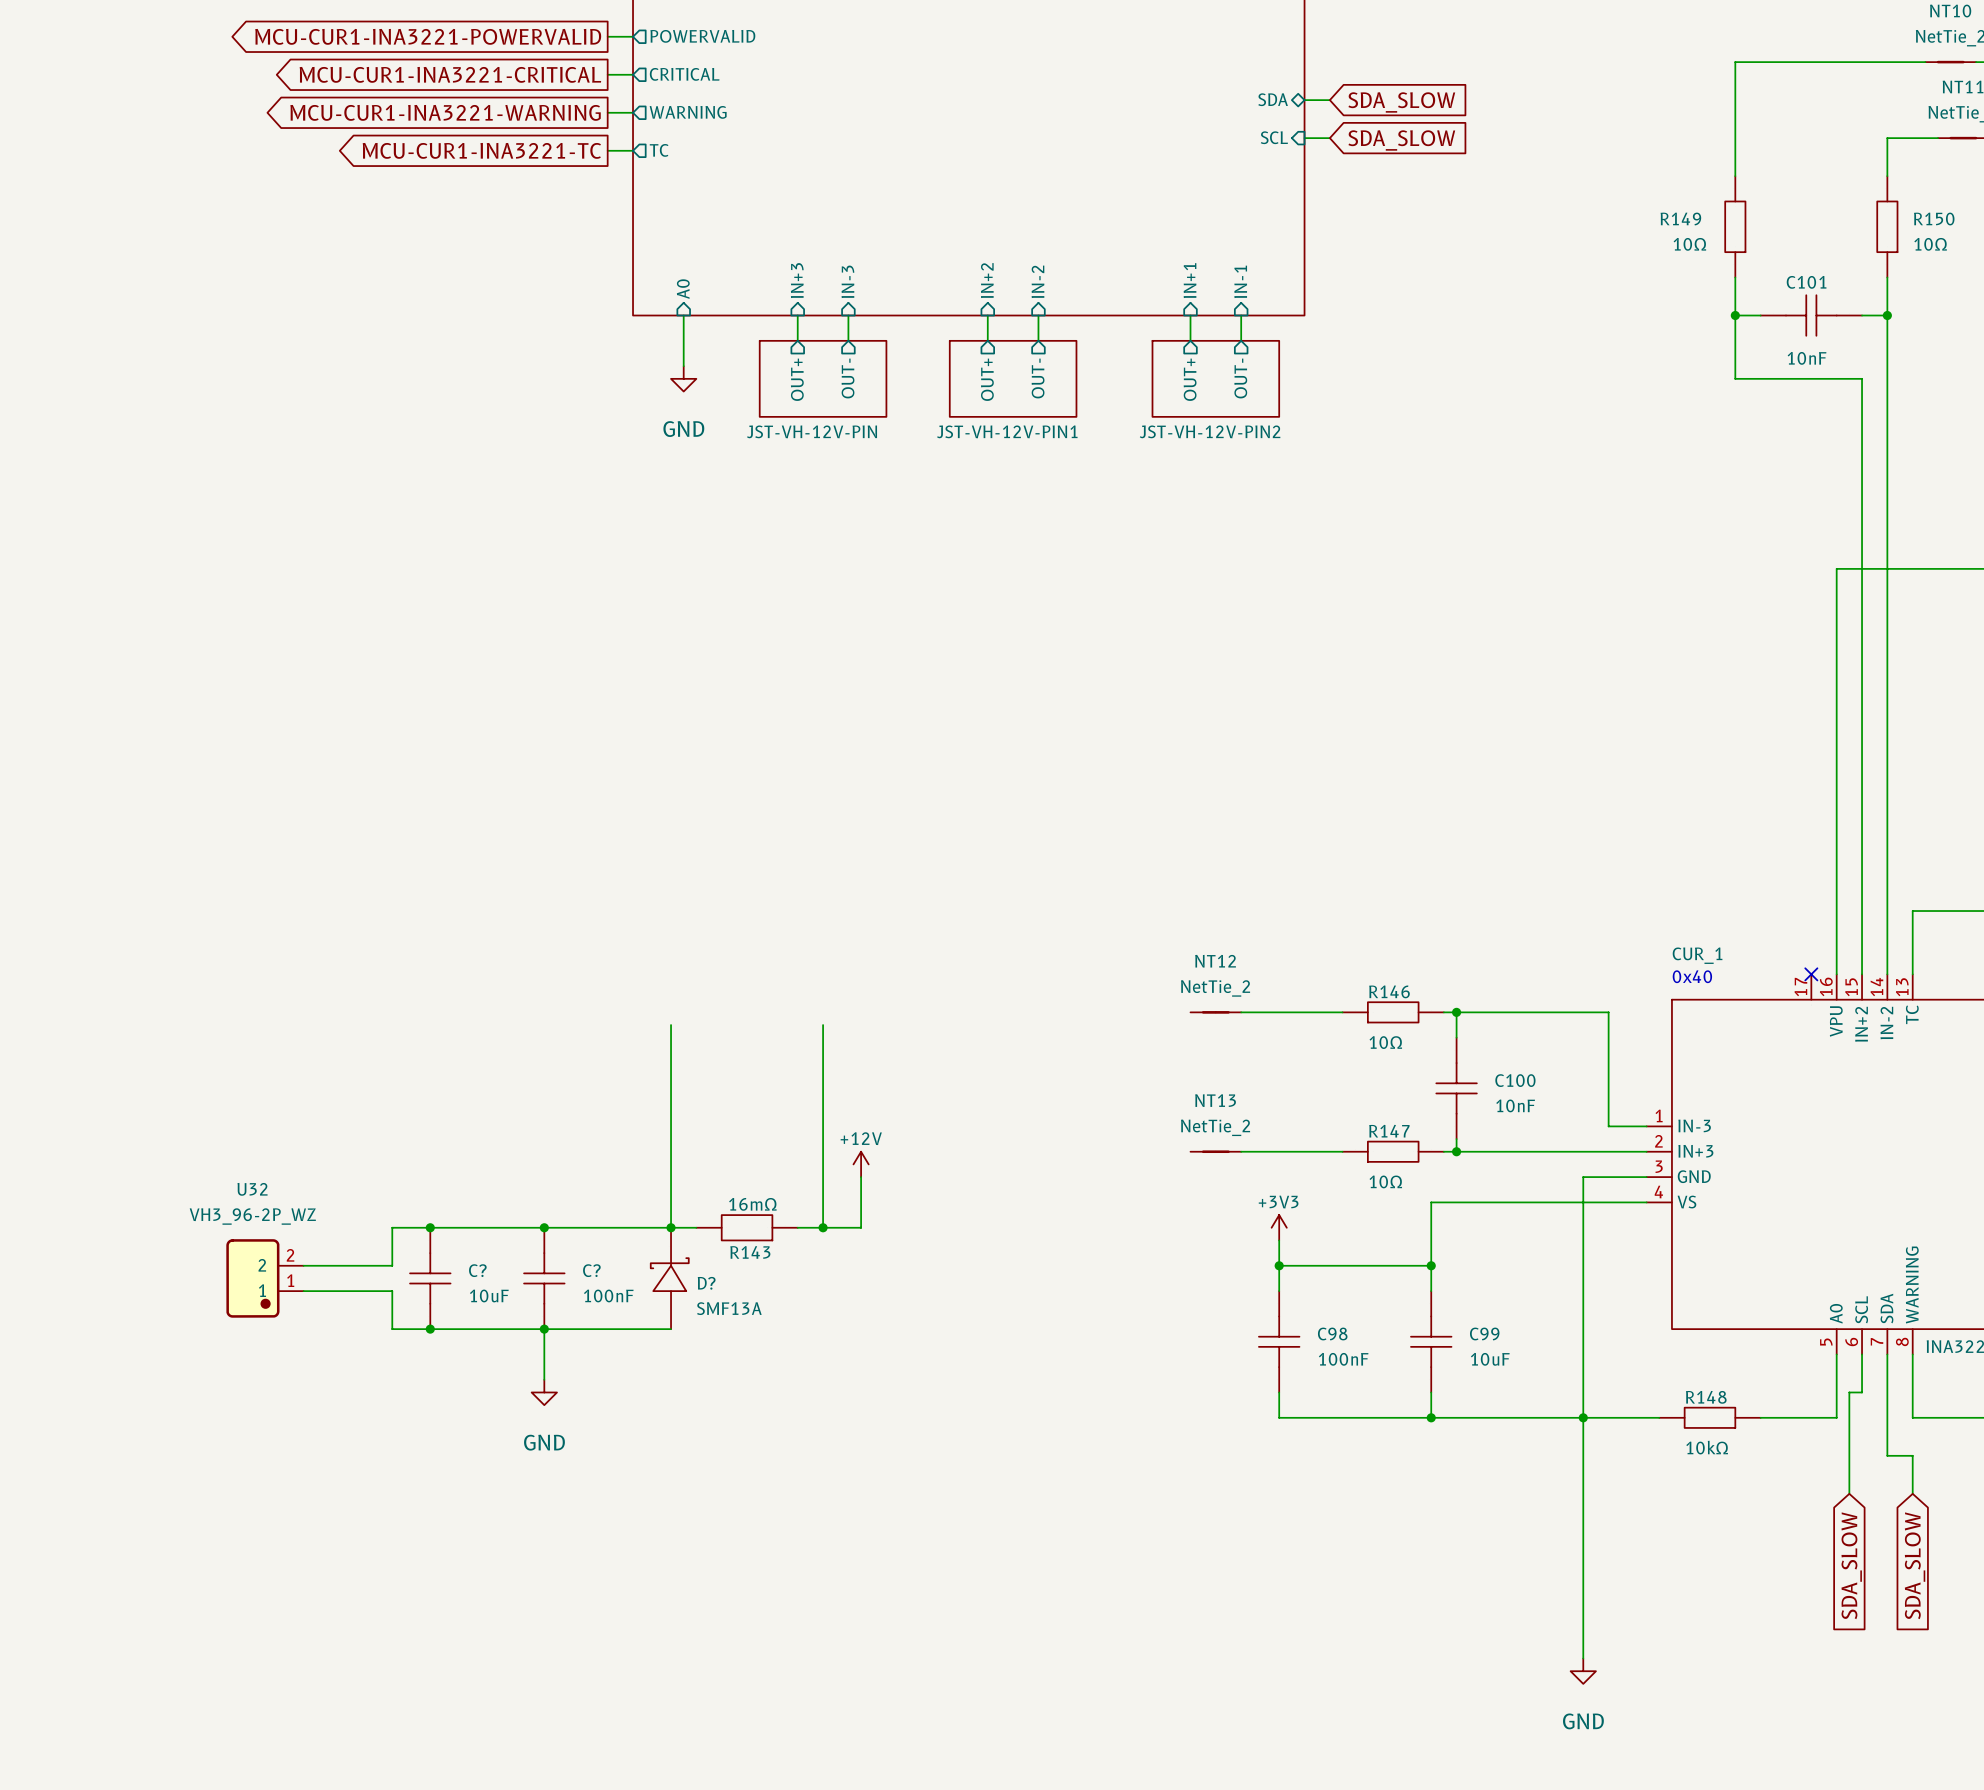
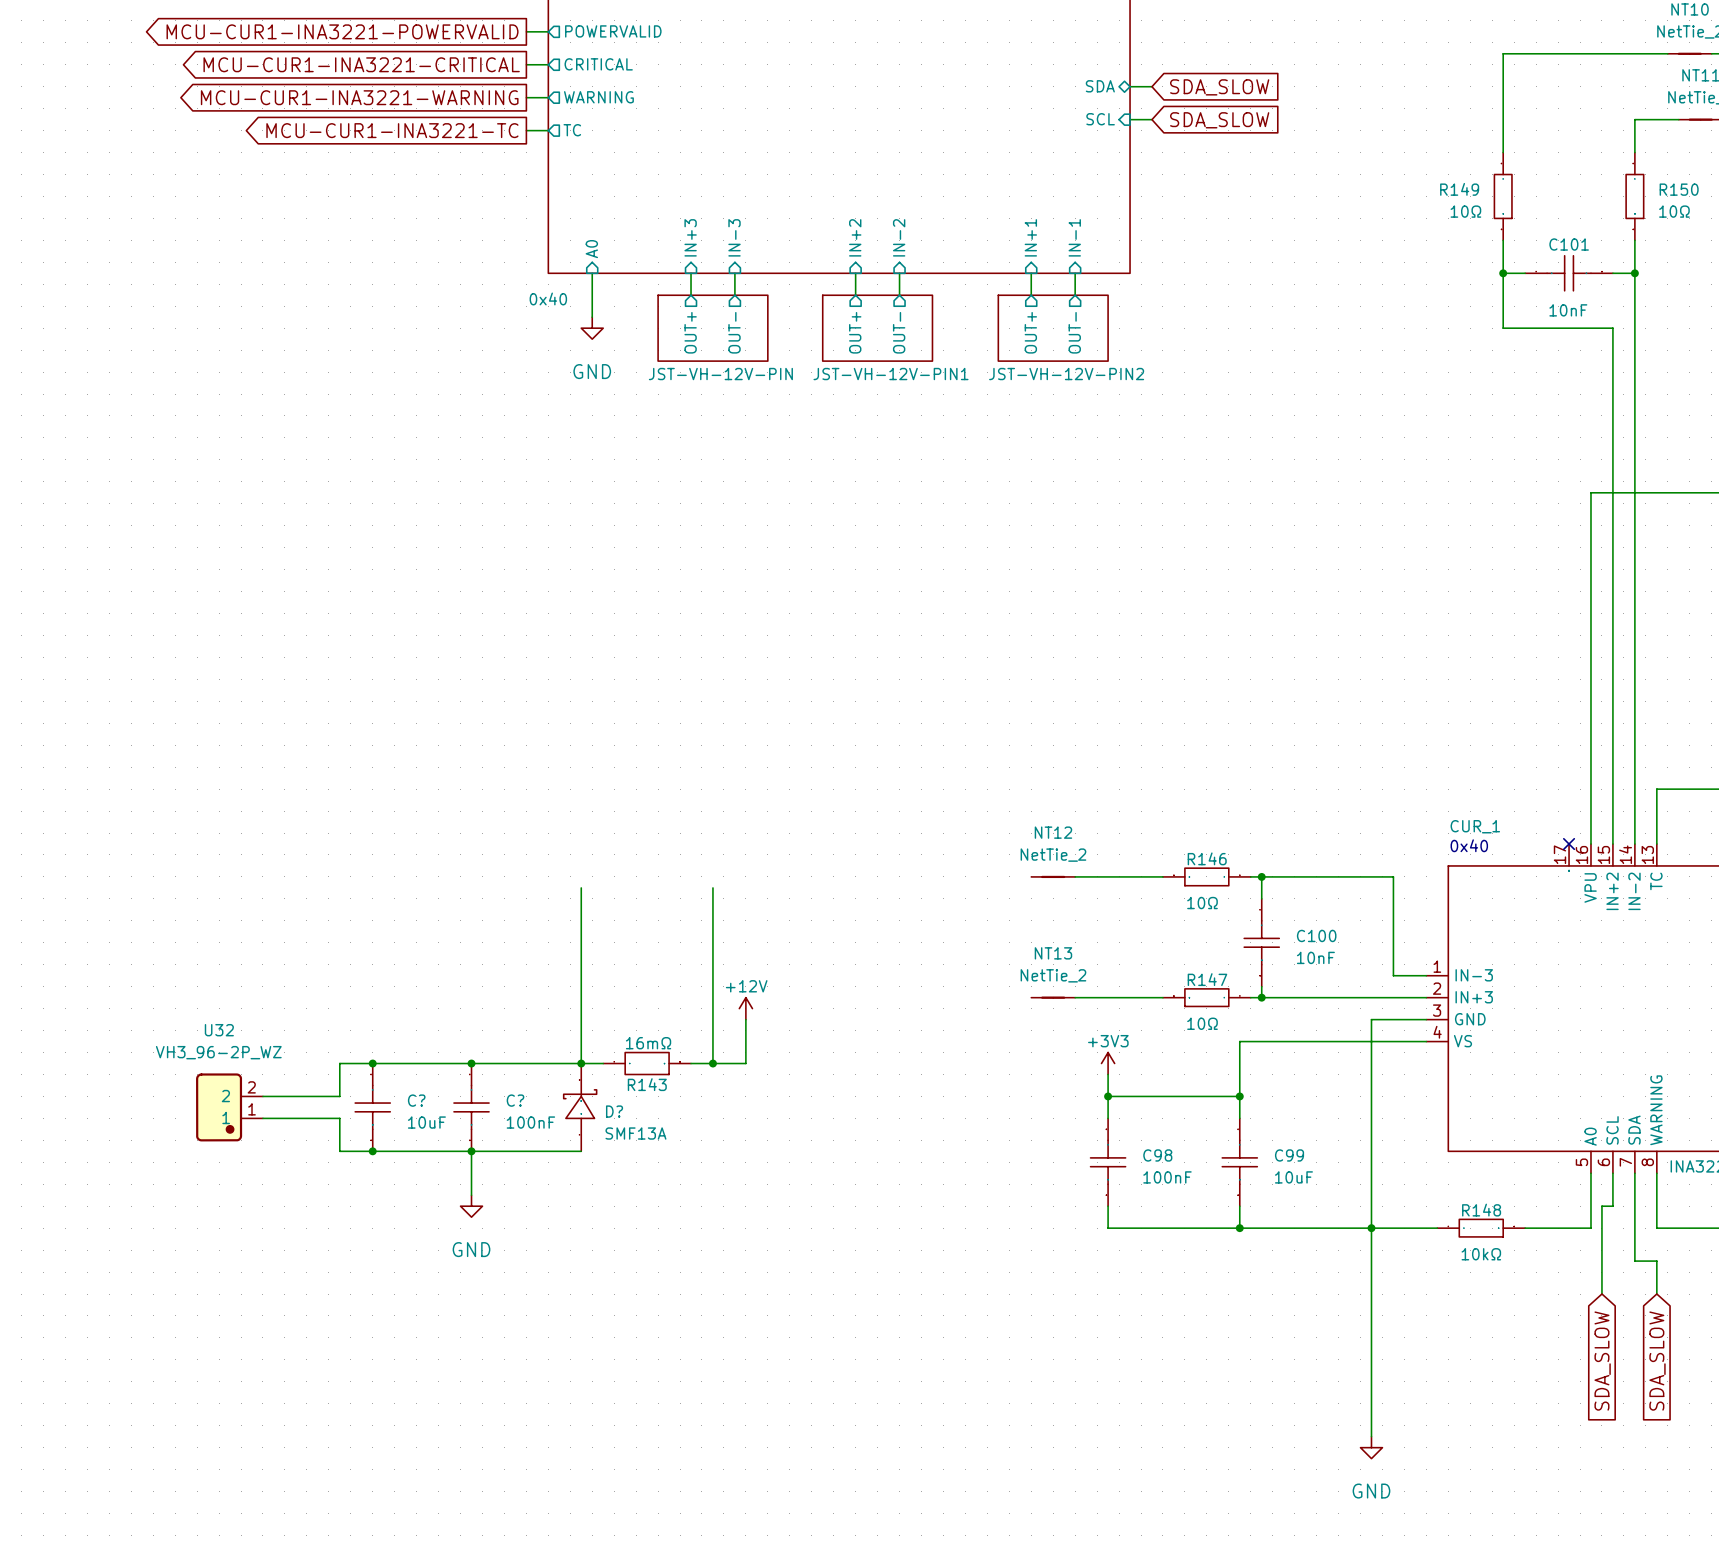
sheet text: none -> 0x40 (548, 298)

